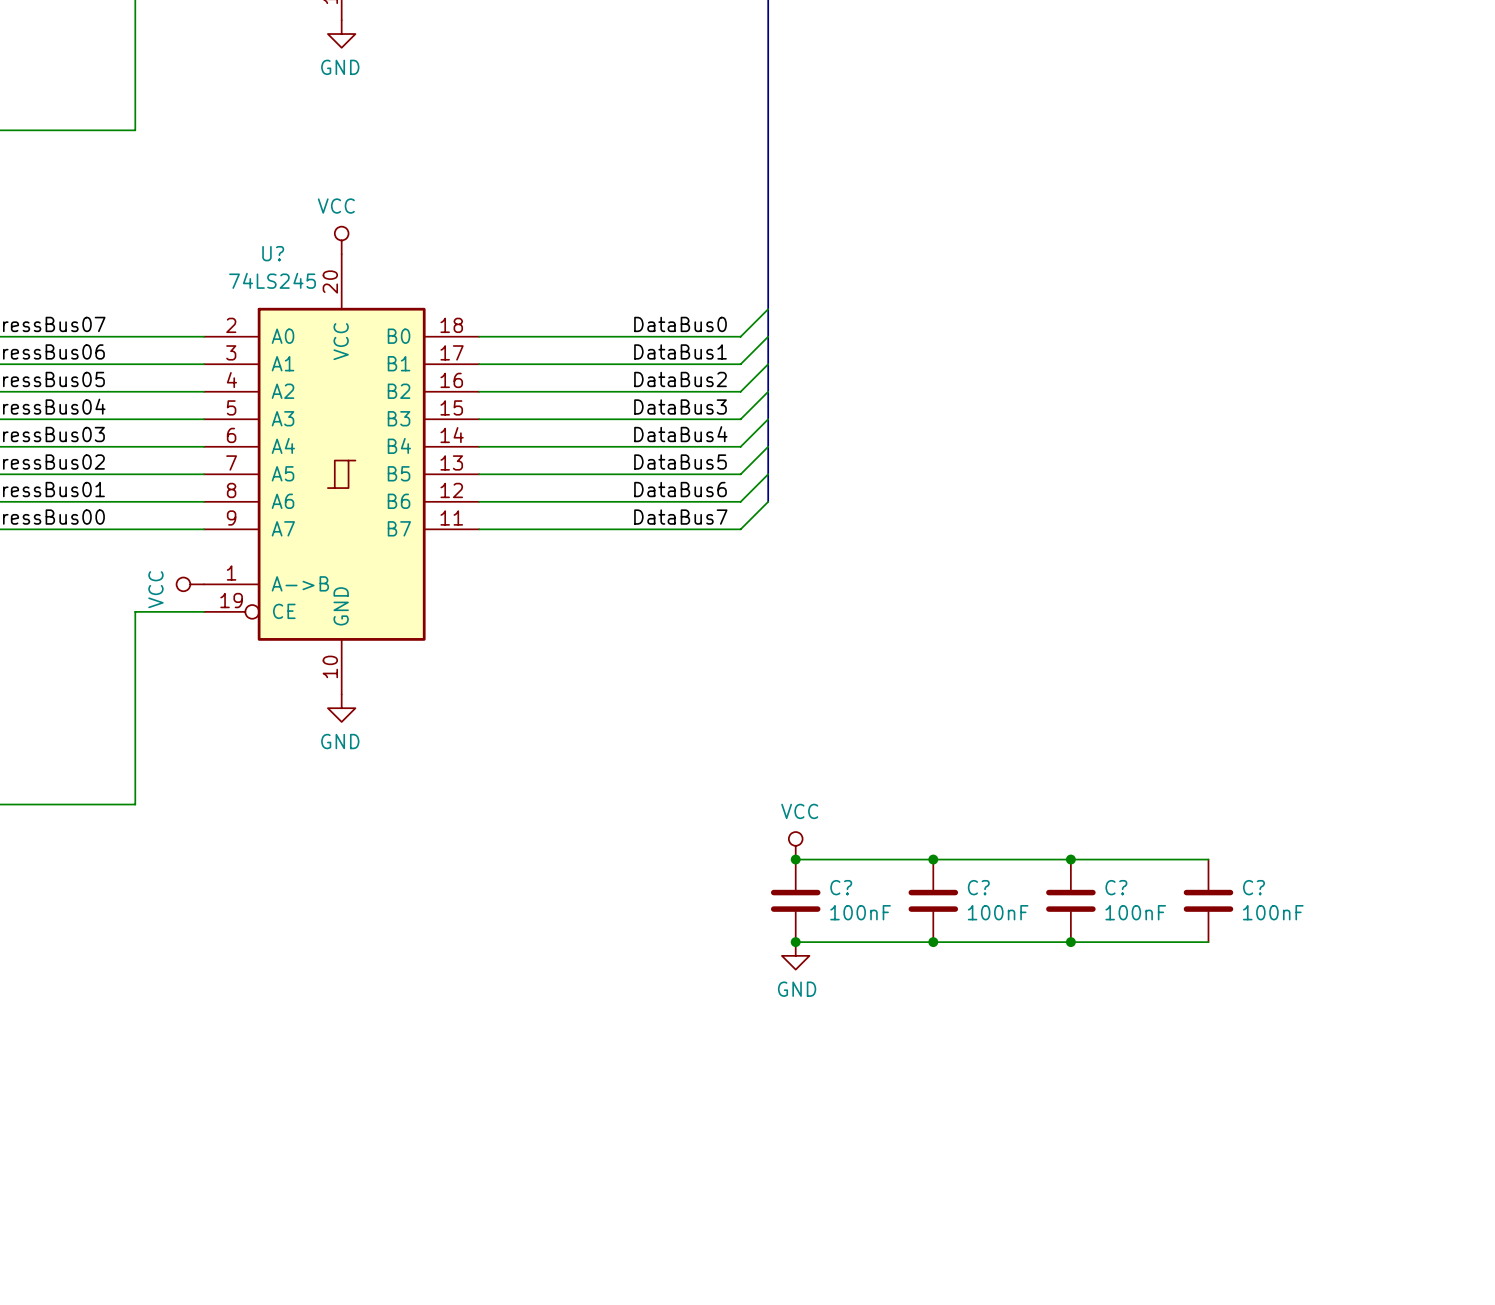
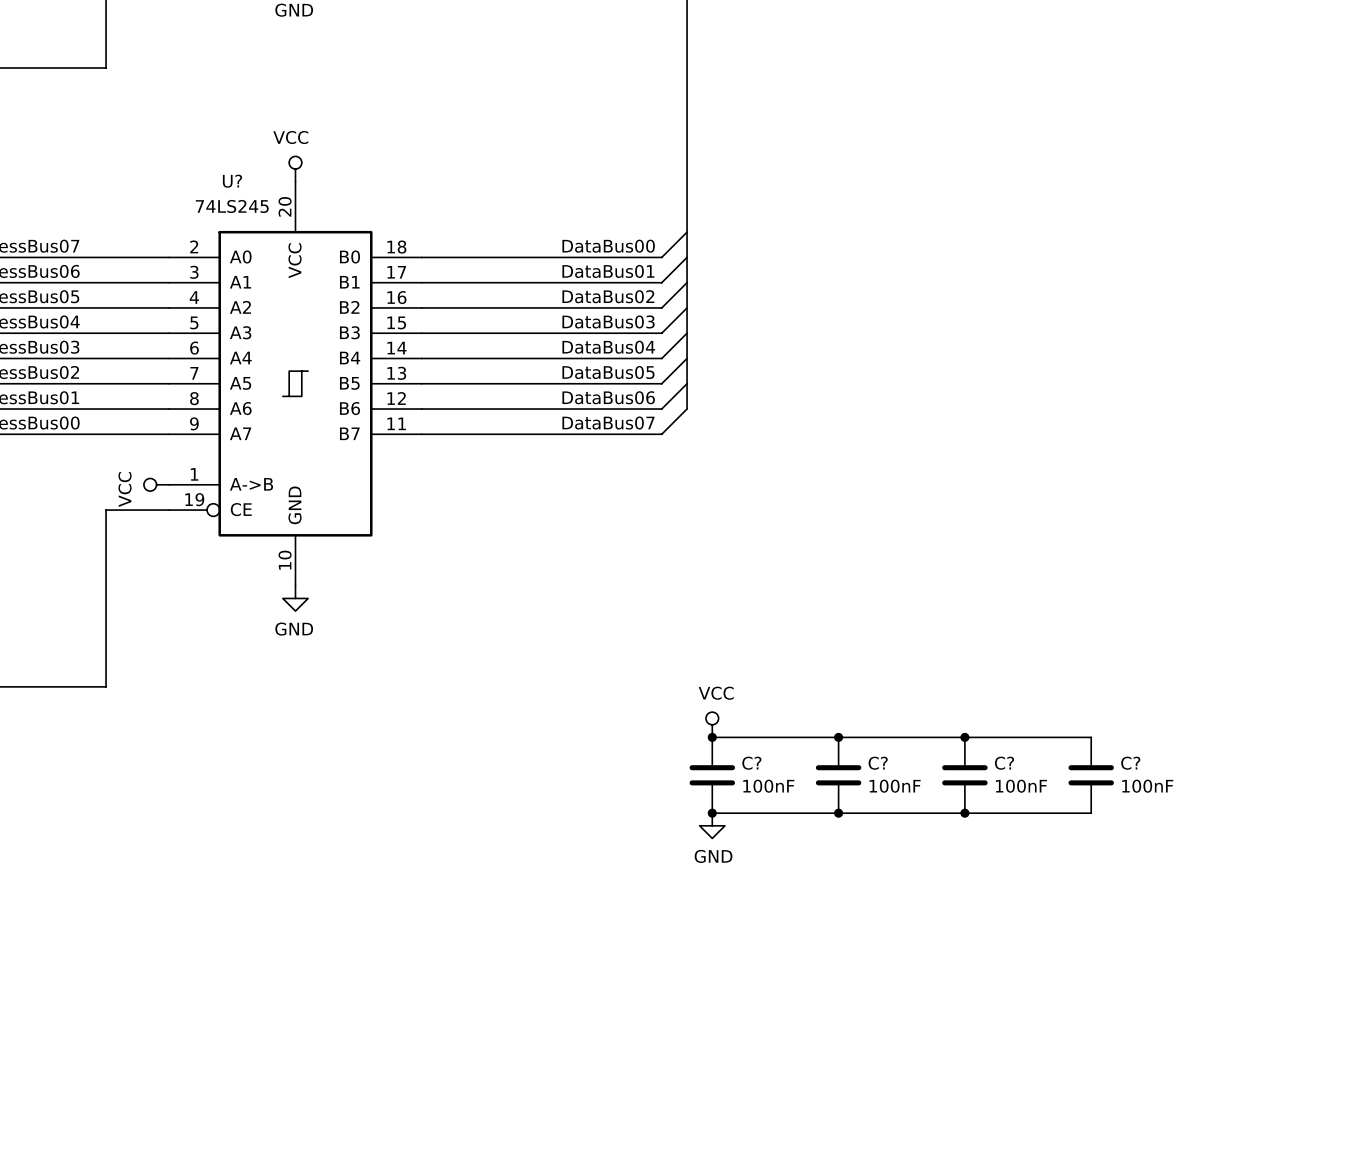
label: DataBus0 (680, 324) -> DataBus00 (608, 246)
label: DataBus1 (680, 351) -> DataBus01 (608, 271)
label: DataBus2 (680, 379) -> DataBus02 (608, 296)
label: DataBus3 (680, 406) -> DataBus03 (608, 321)
label: DataBus4 (680, 434) -> DataBus04 (608, 347)
label: DataBus5 (680, 462) -> DataBus05 (608, 372)
label: DataBus6 (680, 489) -> DataBus06 (608, 397)
label: DataBus7 (680, 517) -> DataBus07 (608, 423)

